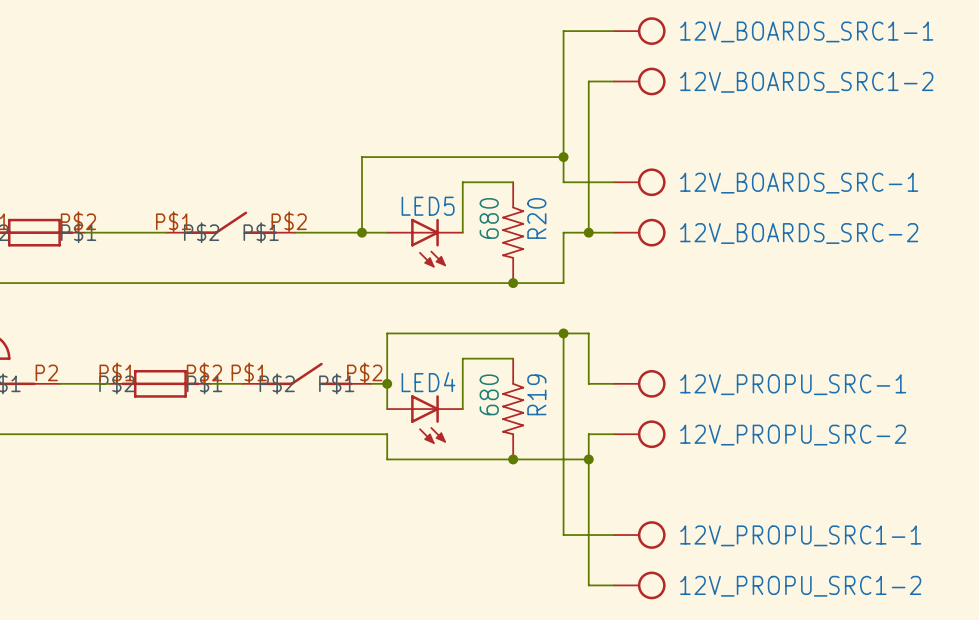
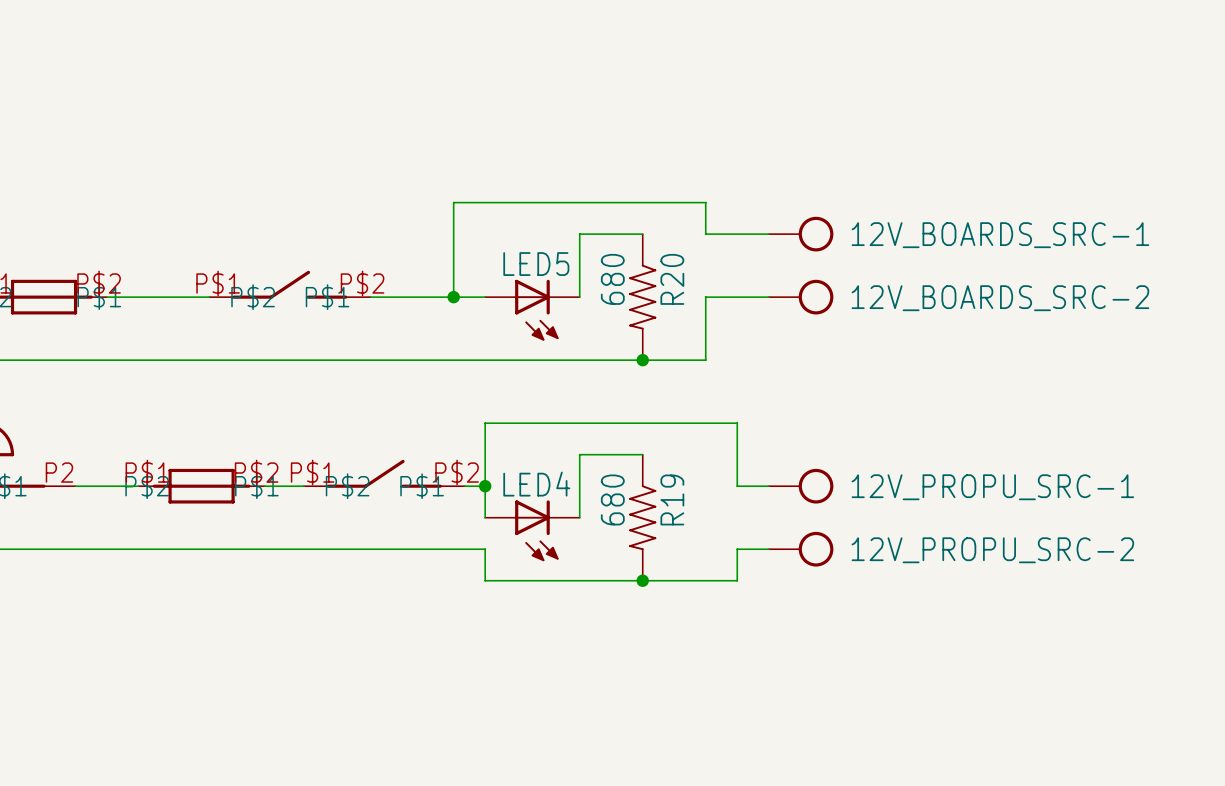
wire: (613, 31) (563, 31) (563, 157) -> none
12V_BOARDS_SRC1-1: (639, 31) -> none
wire: (613, 81) (588, 81) (588, 232) -> none
12V_BOARDS_SRC1-2: (639, 81) -> none
junction: (563, 157) -> none
junction: (588, 232) -> none
wire: (563, 333) (563, 535) (613, 535) -> none
junction: (563, 333) -> none
wire: (588, 459) (588, 585) (613, 585) -> none
junction: (588, 459) -> none
12V_PROPU_SRC1-1: (639, 535) -> none
12V_PROPU_SRC1-2: (639, 585) -> none

